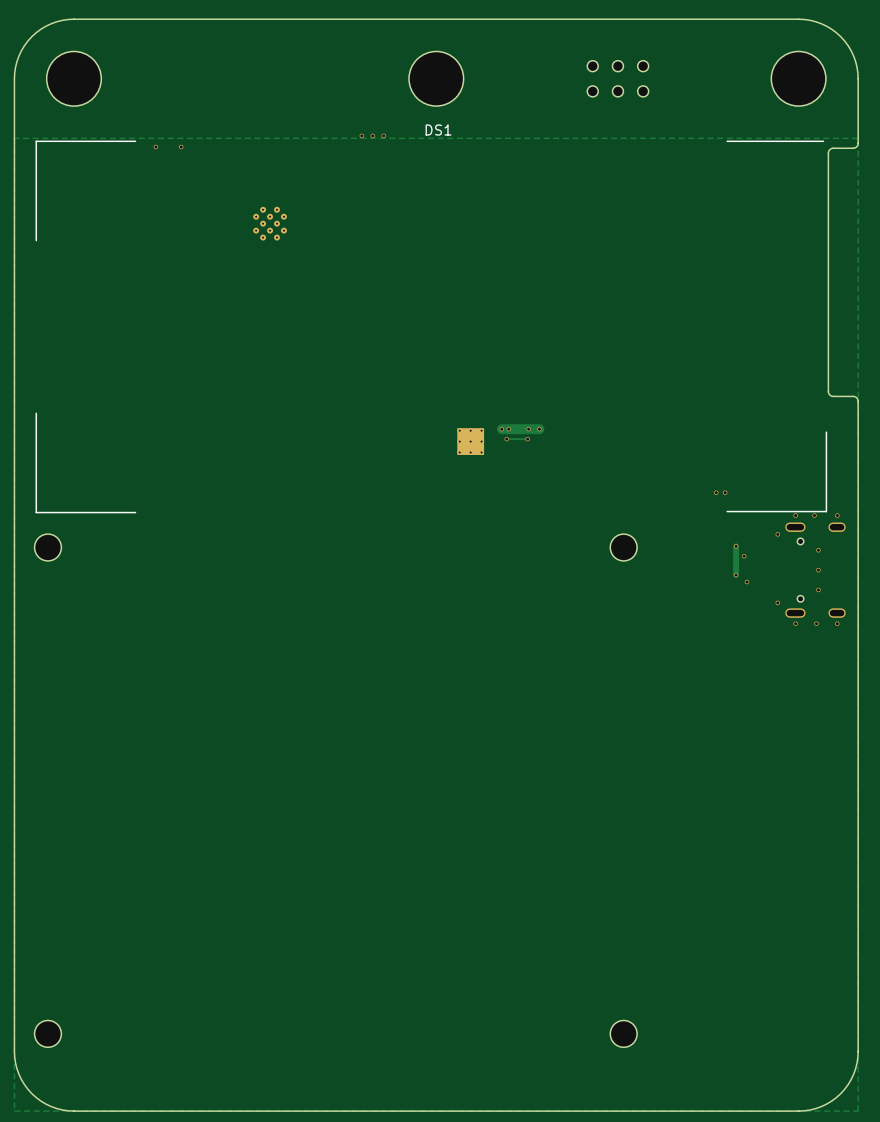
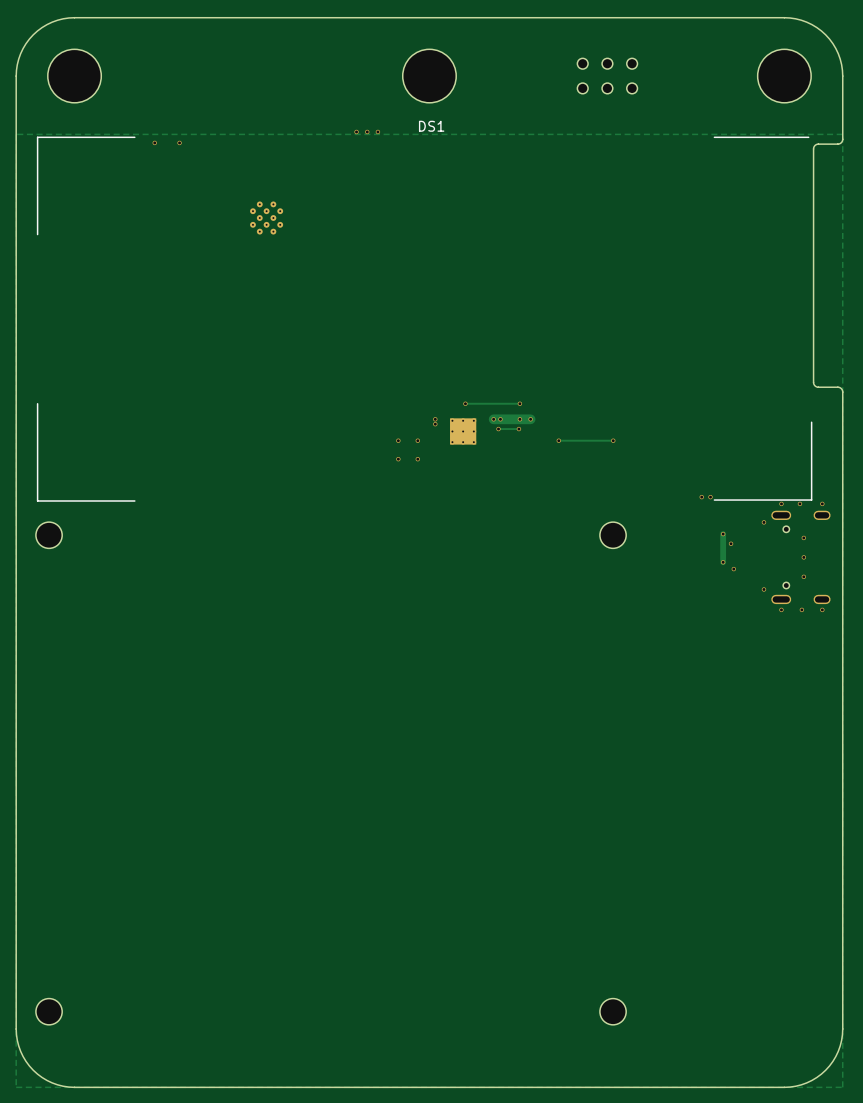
via: none -> (465, 403)
track: none -> (519, 403) (465, 403)
via: none -> (519, 403)
via: none -> (435, 419)
via: none -> (435, 424)
via: none -> (398, 440)
via: none -> (417, 440)
via: none -> (558, 440)
track: none -> (613, 440) (558, 440)
via: none -> (613, 440)
via: none -> (398, 459)
via: none -> (417, 459)
via: (716, 492) -> none
via: (725, 492) -> none
via: none -> (701, 497)
via: none -> (710, 497)

